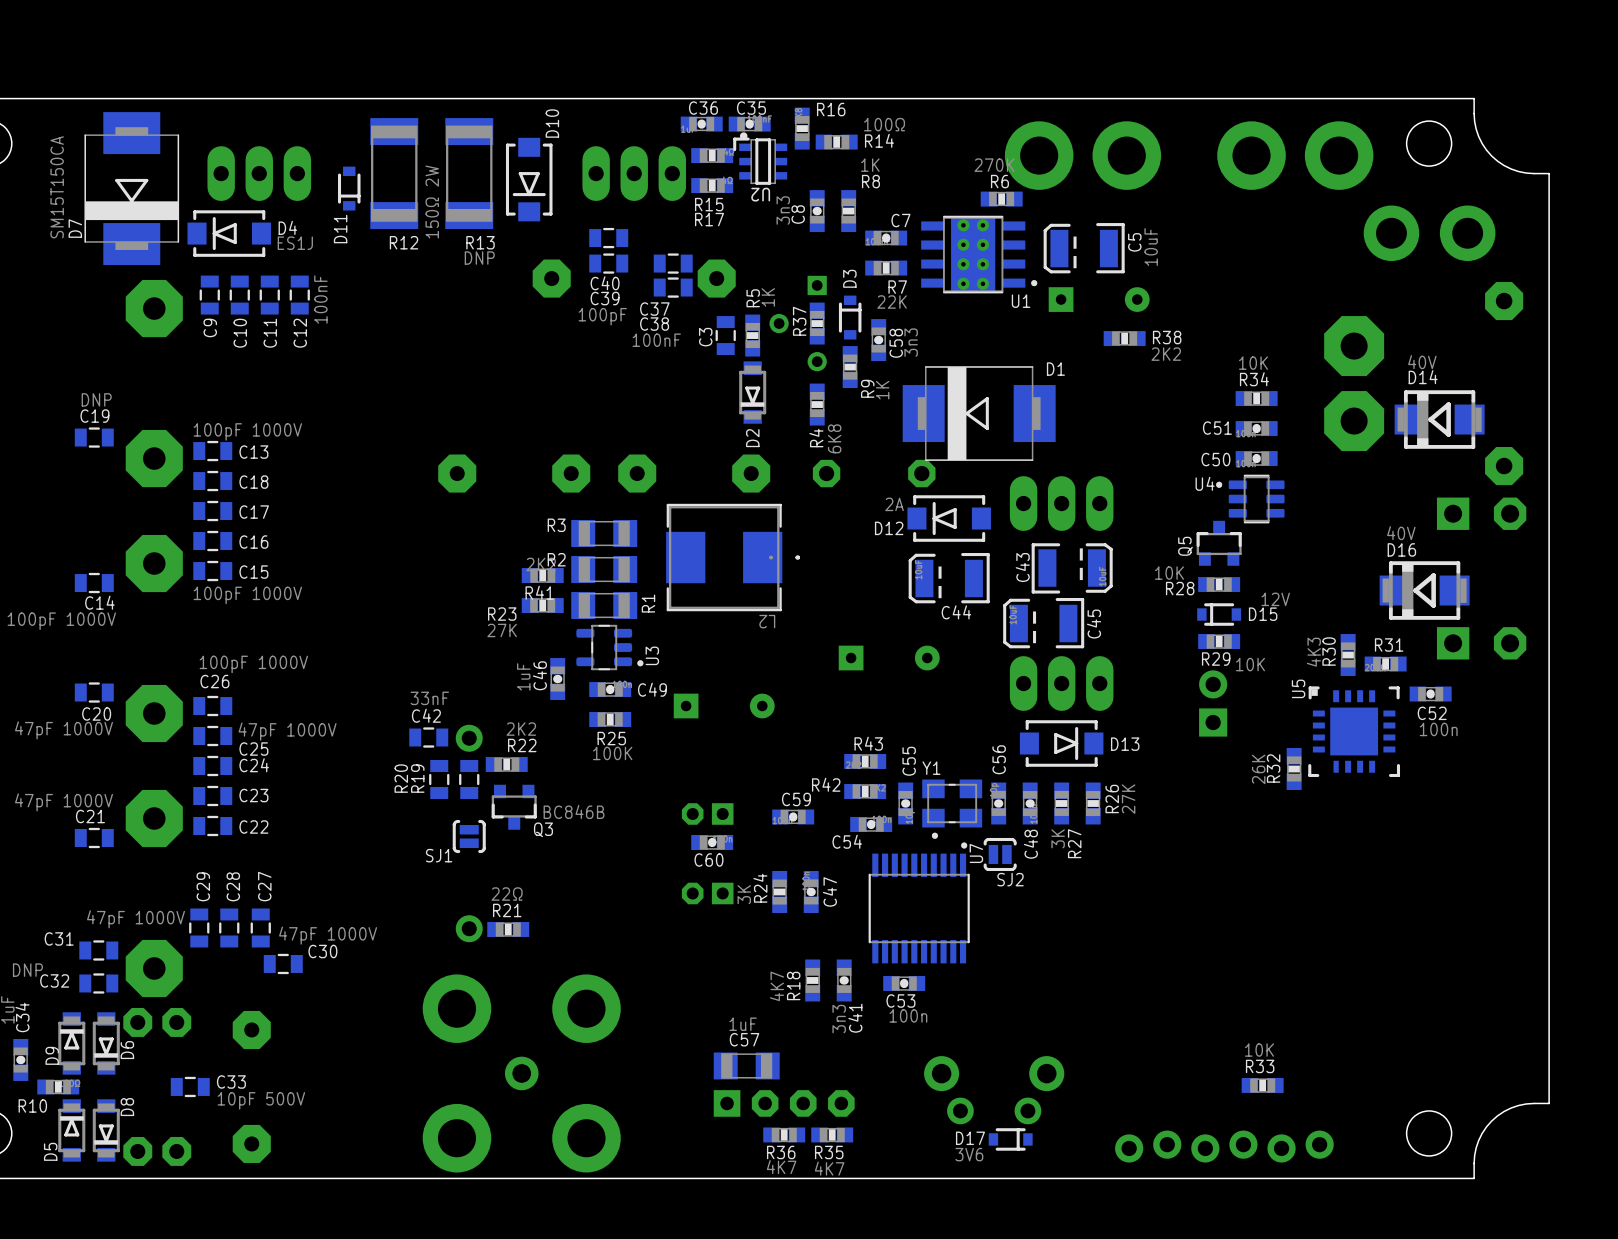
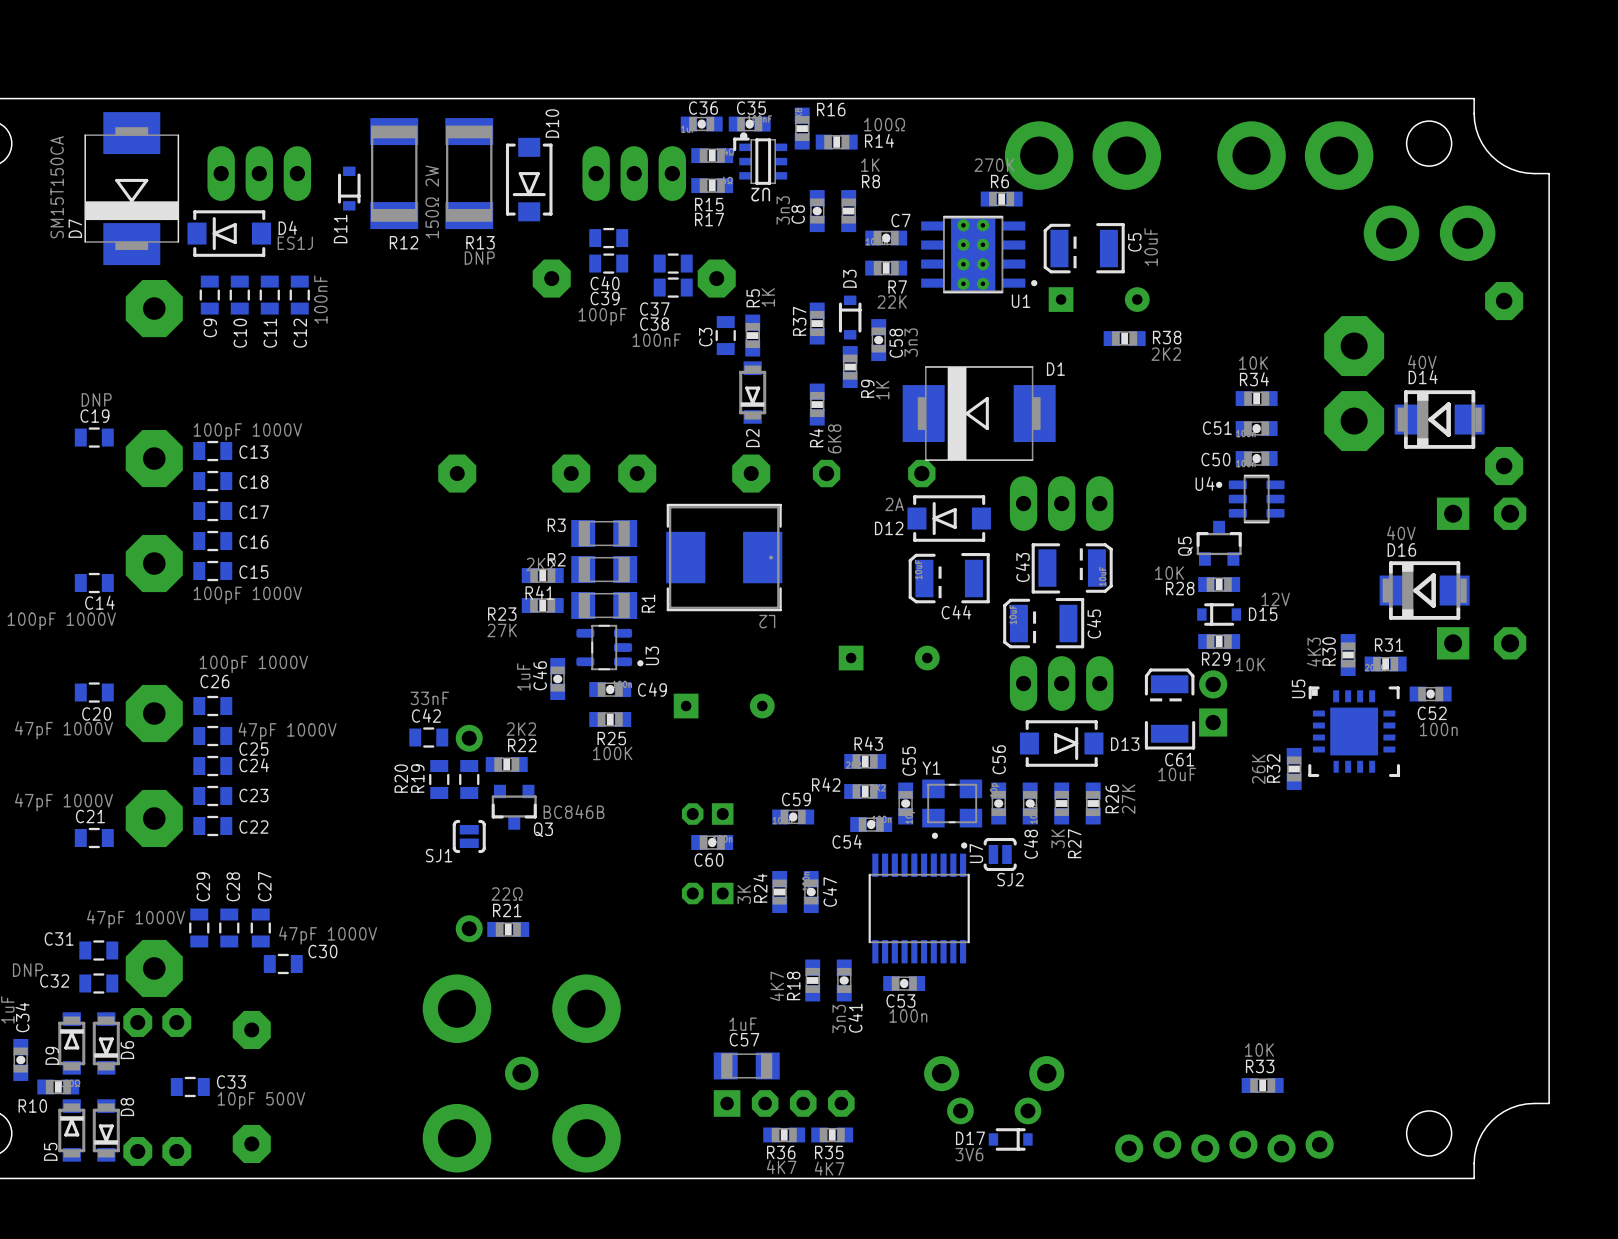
part: (798, 323) -> none
L2 footprint: [666, 503, 801, 612] -> [666, 503, 783, 612]
C61: none -> 10uF (1170, 709)

